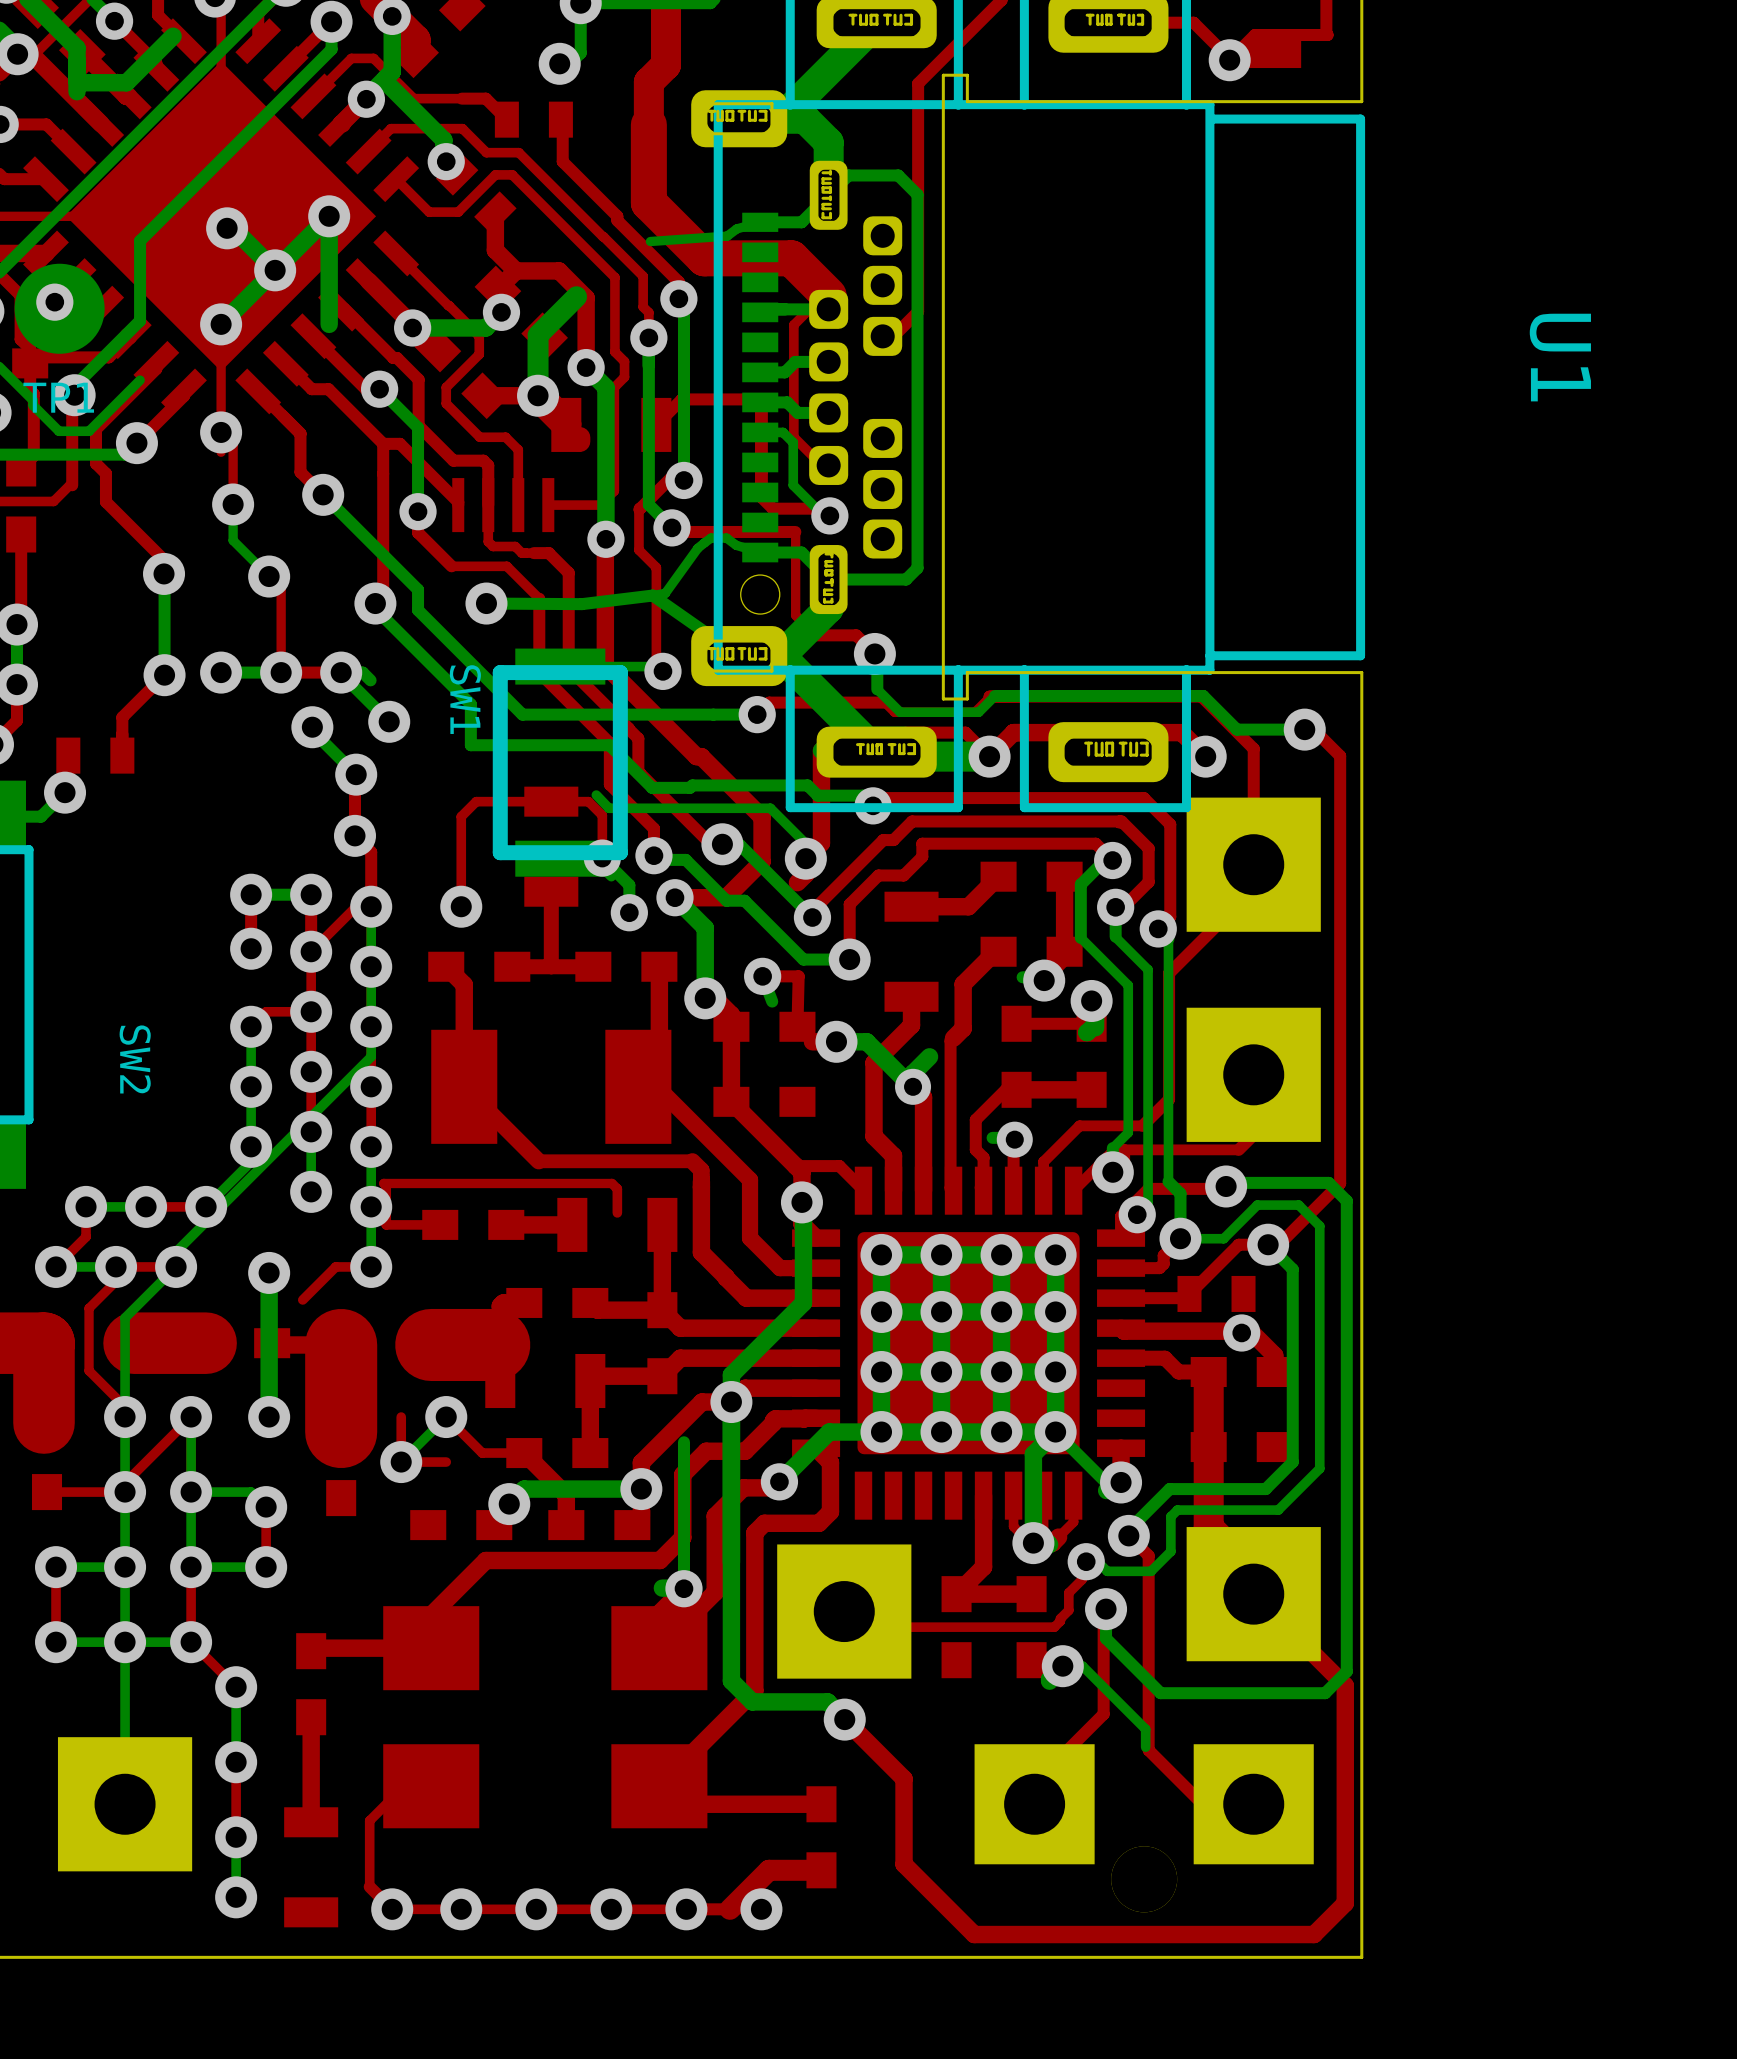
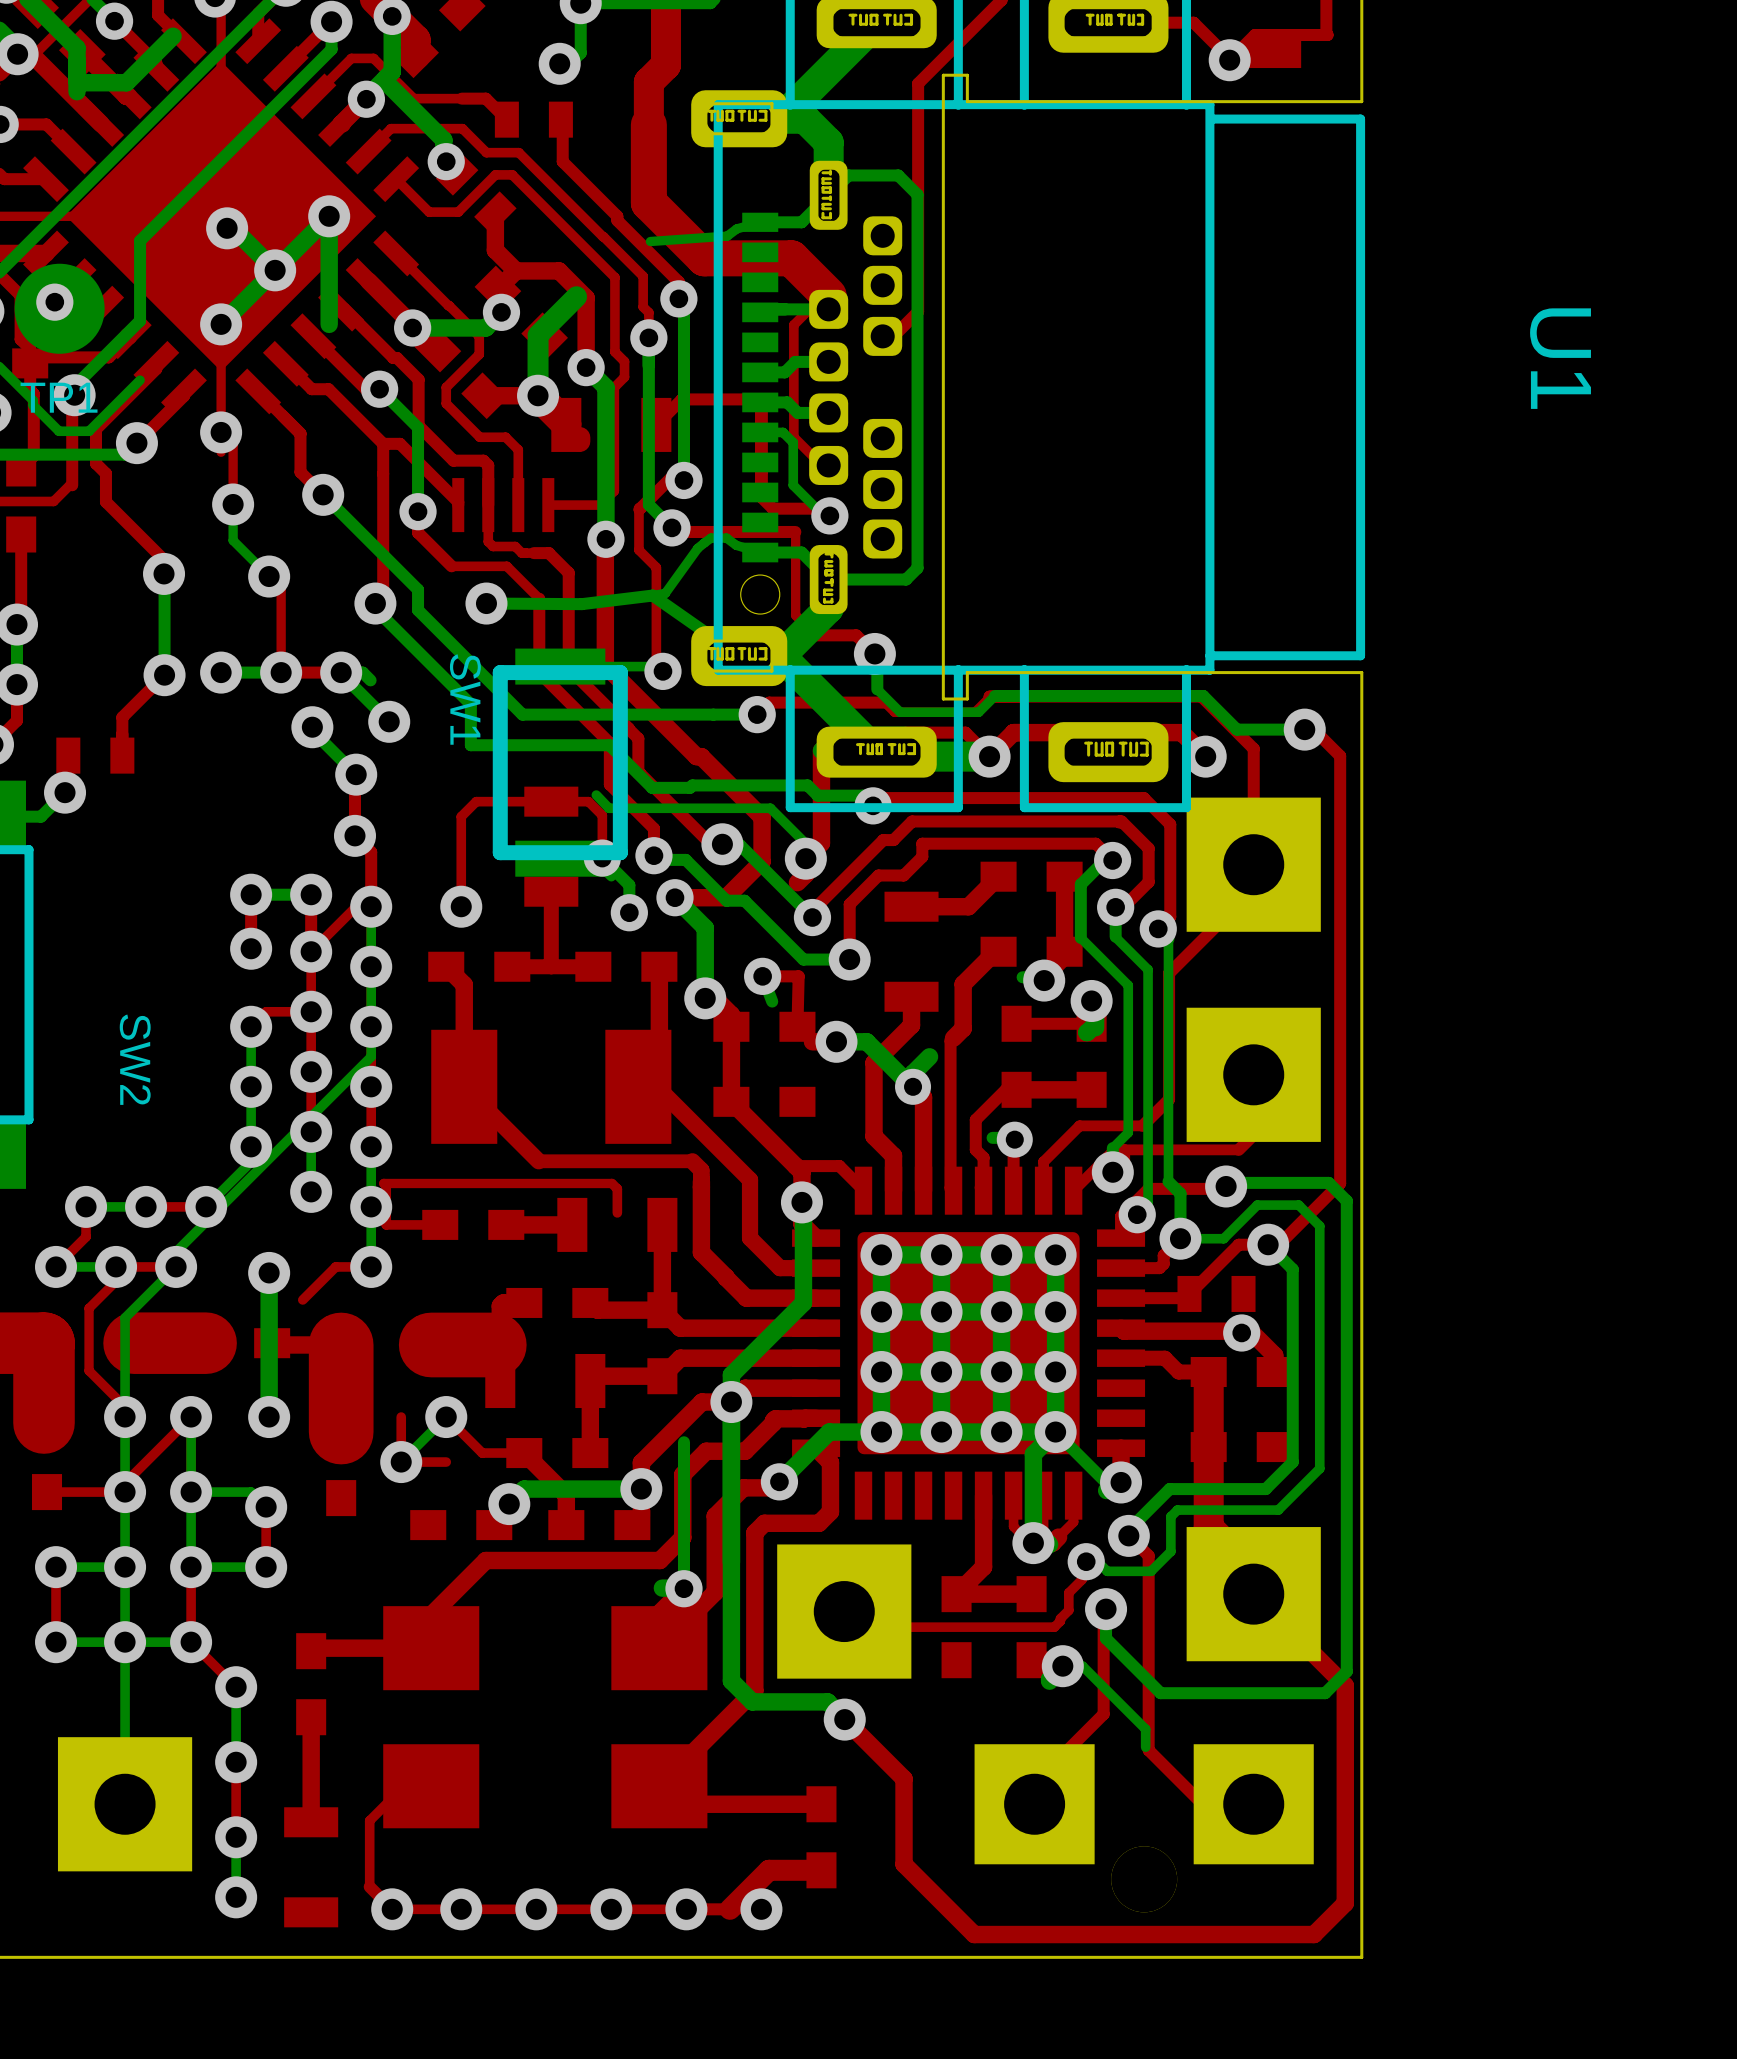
top track width: thick (341, 1344) (341, 1432) -> thin (341, 1344) (341, 1432)
top track width: thick (494, 1344) (431, 1344) -> thin (494, 1344) (431, 1344)

